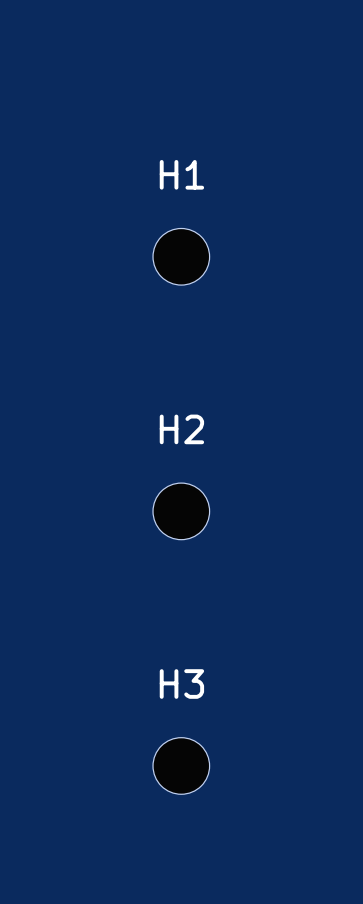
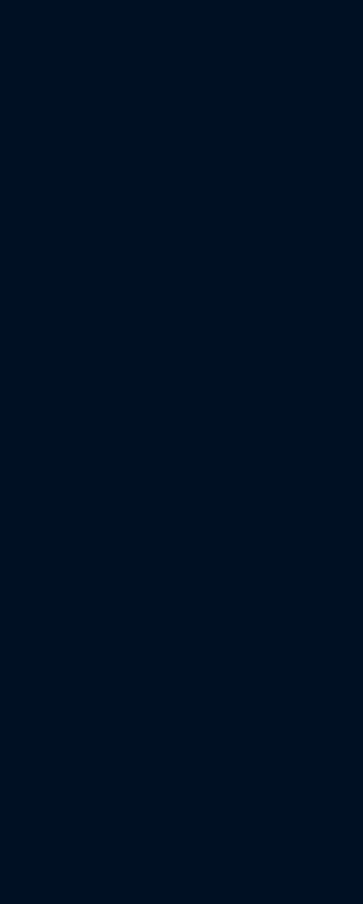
H1: (181, 256) -> none
H2: (181, 511) -> none
H3: (181, 765) -> none

